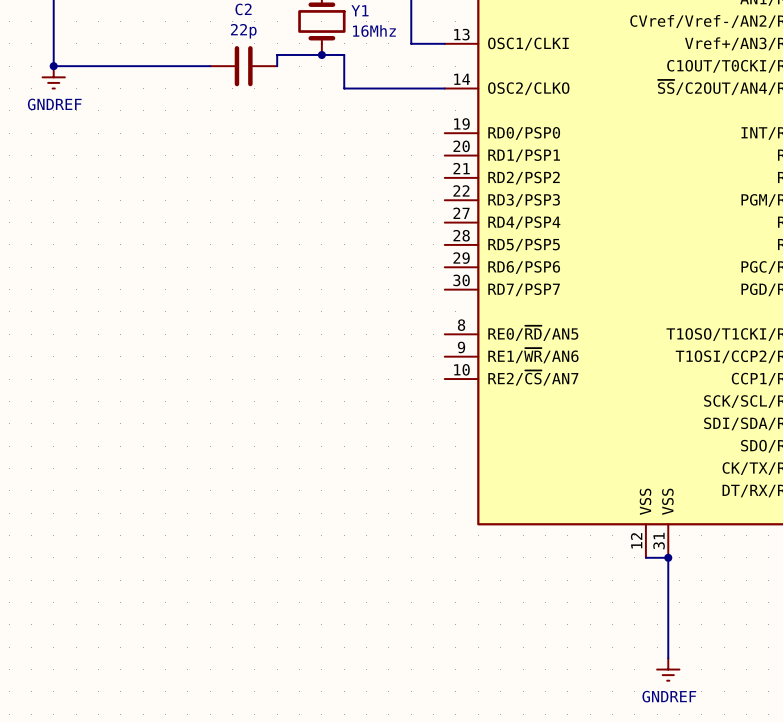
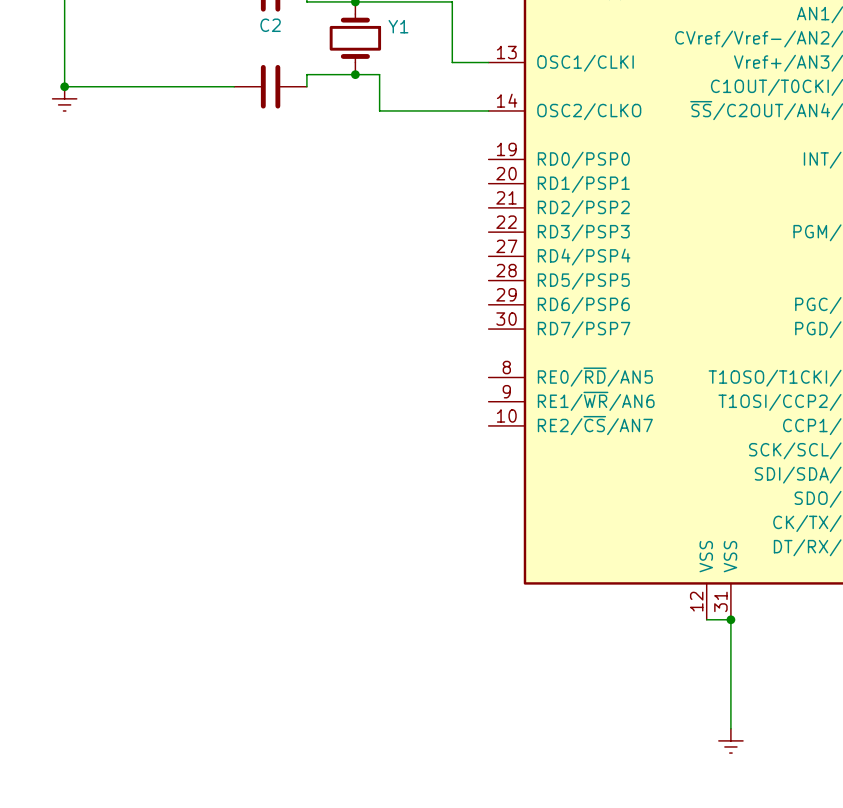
Y1 value: 16Mhz (374, 30) -> none
C2 value: 22p (243, 31) -> none
power symbol text: GNDREF (54, 104) -> none
power symbol text: GNDREF (669, 696) -> none

